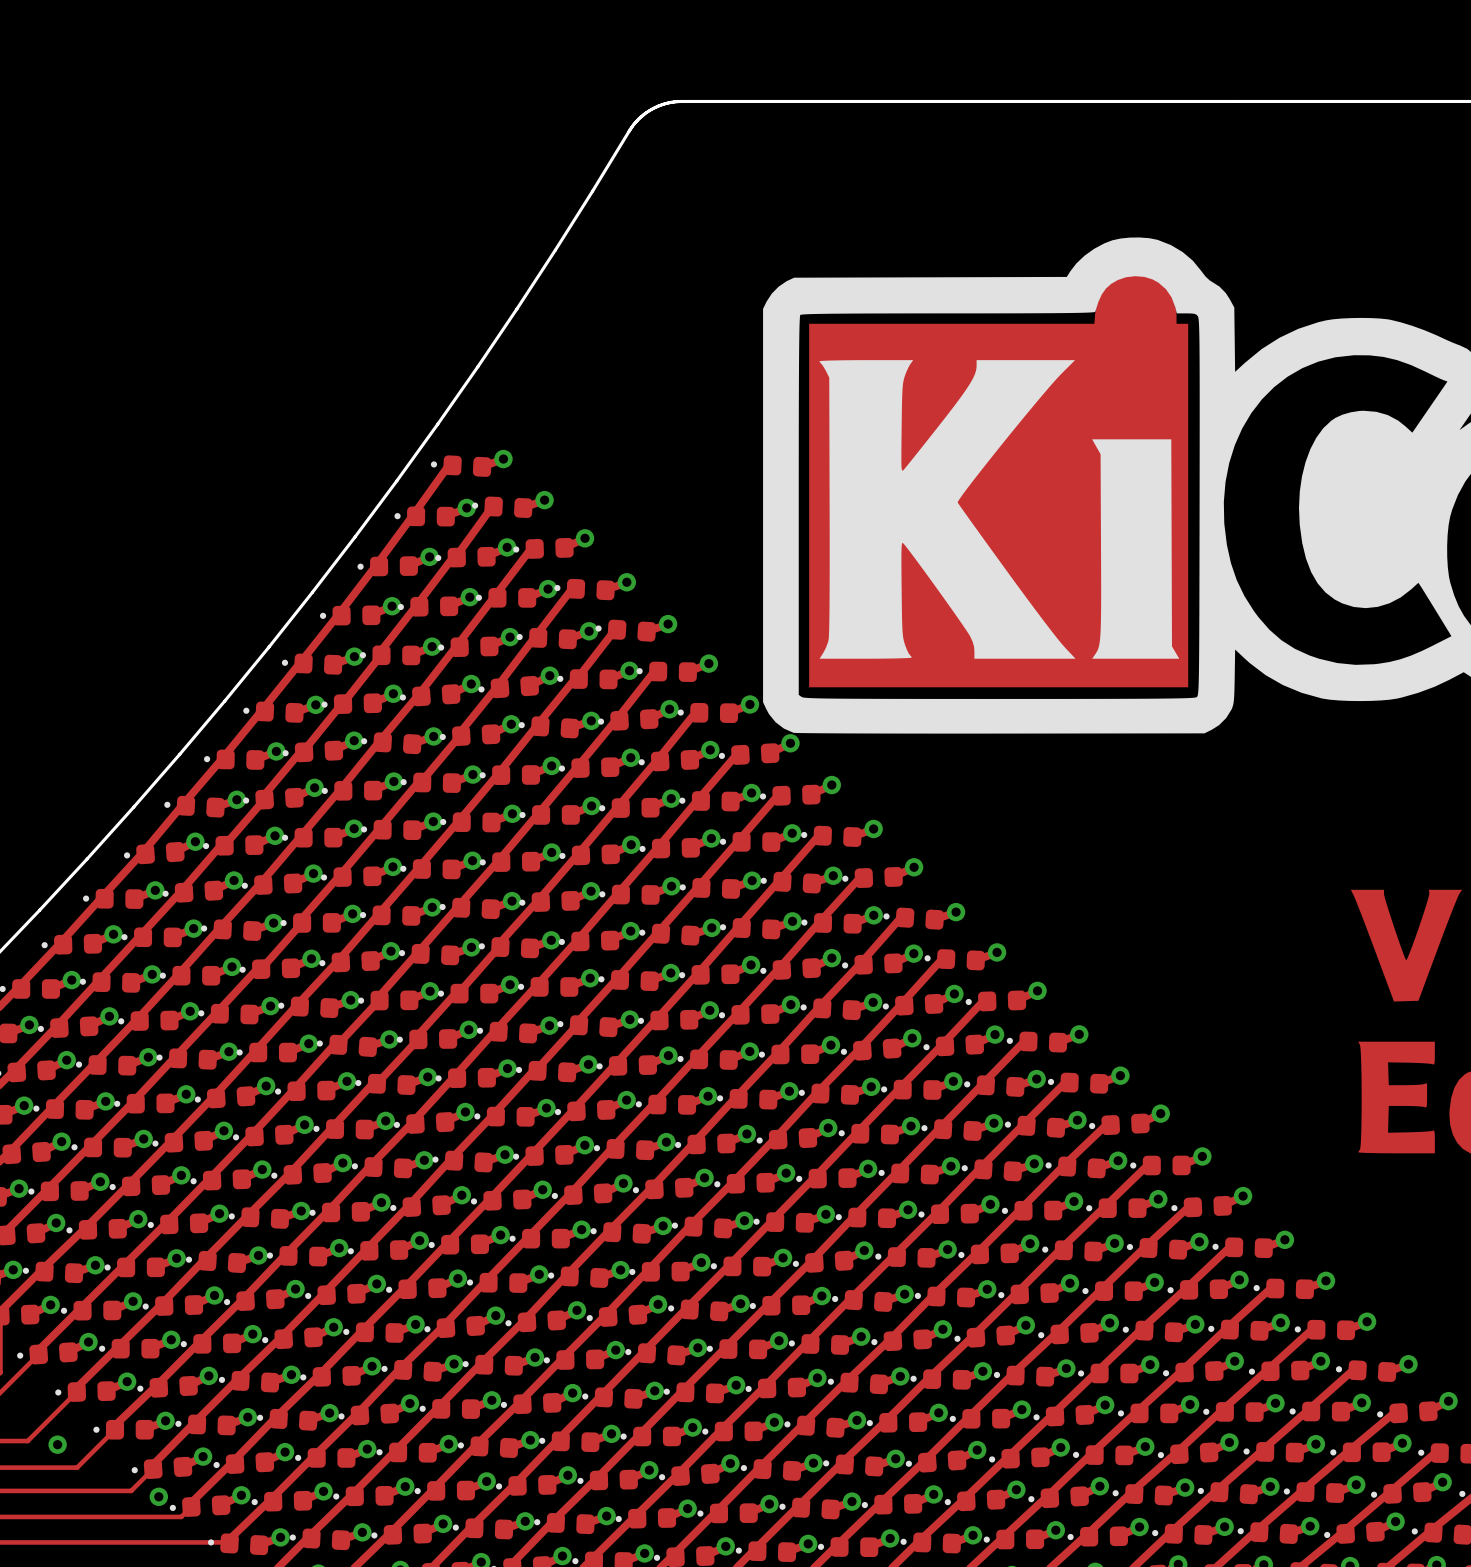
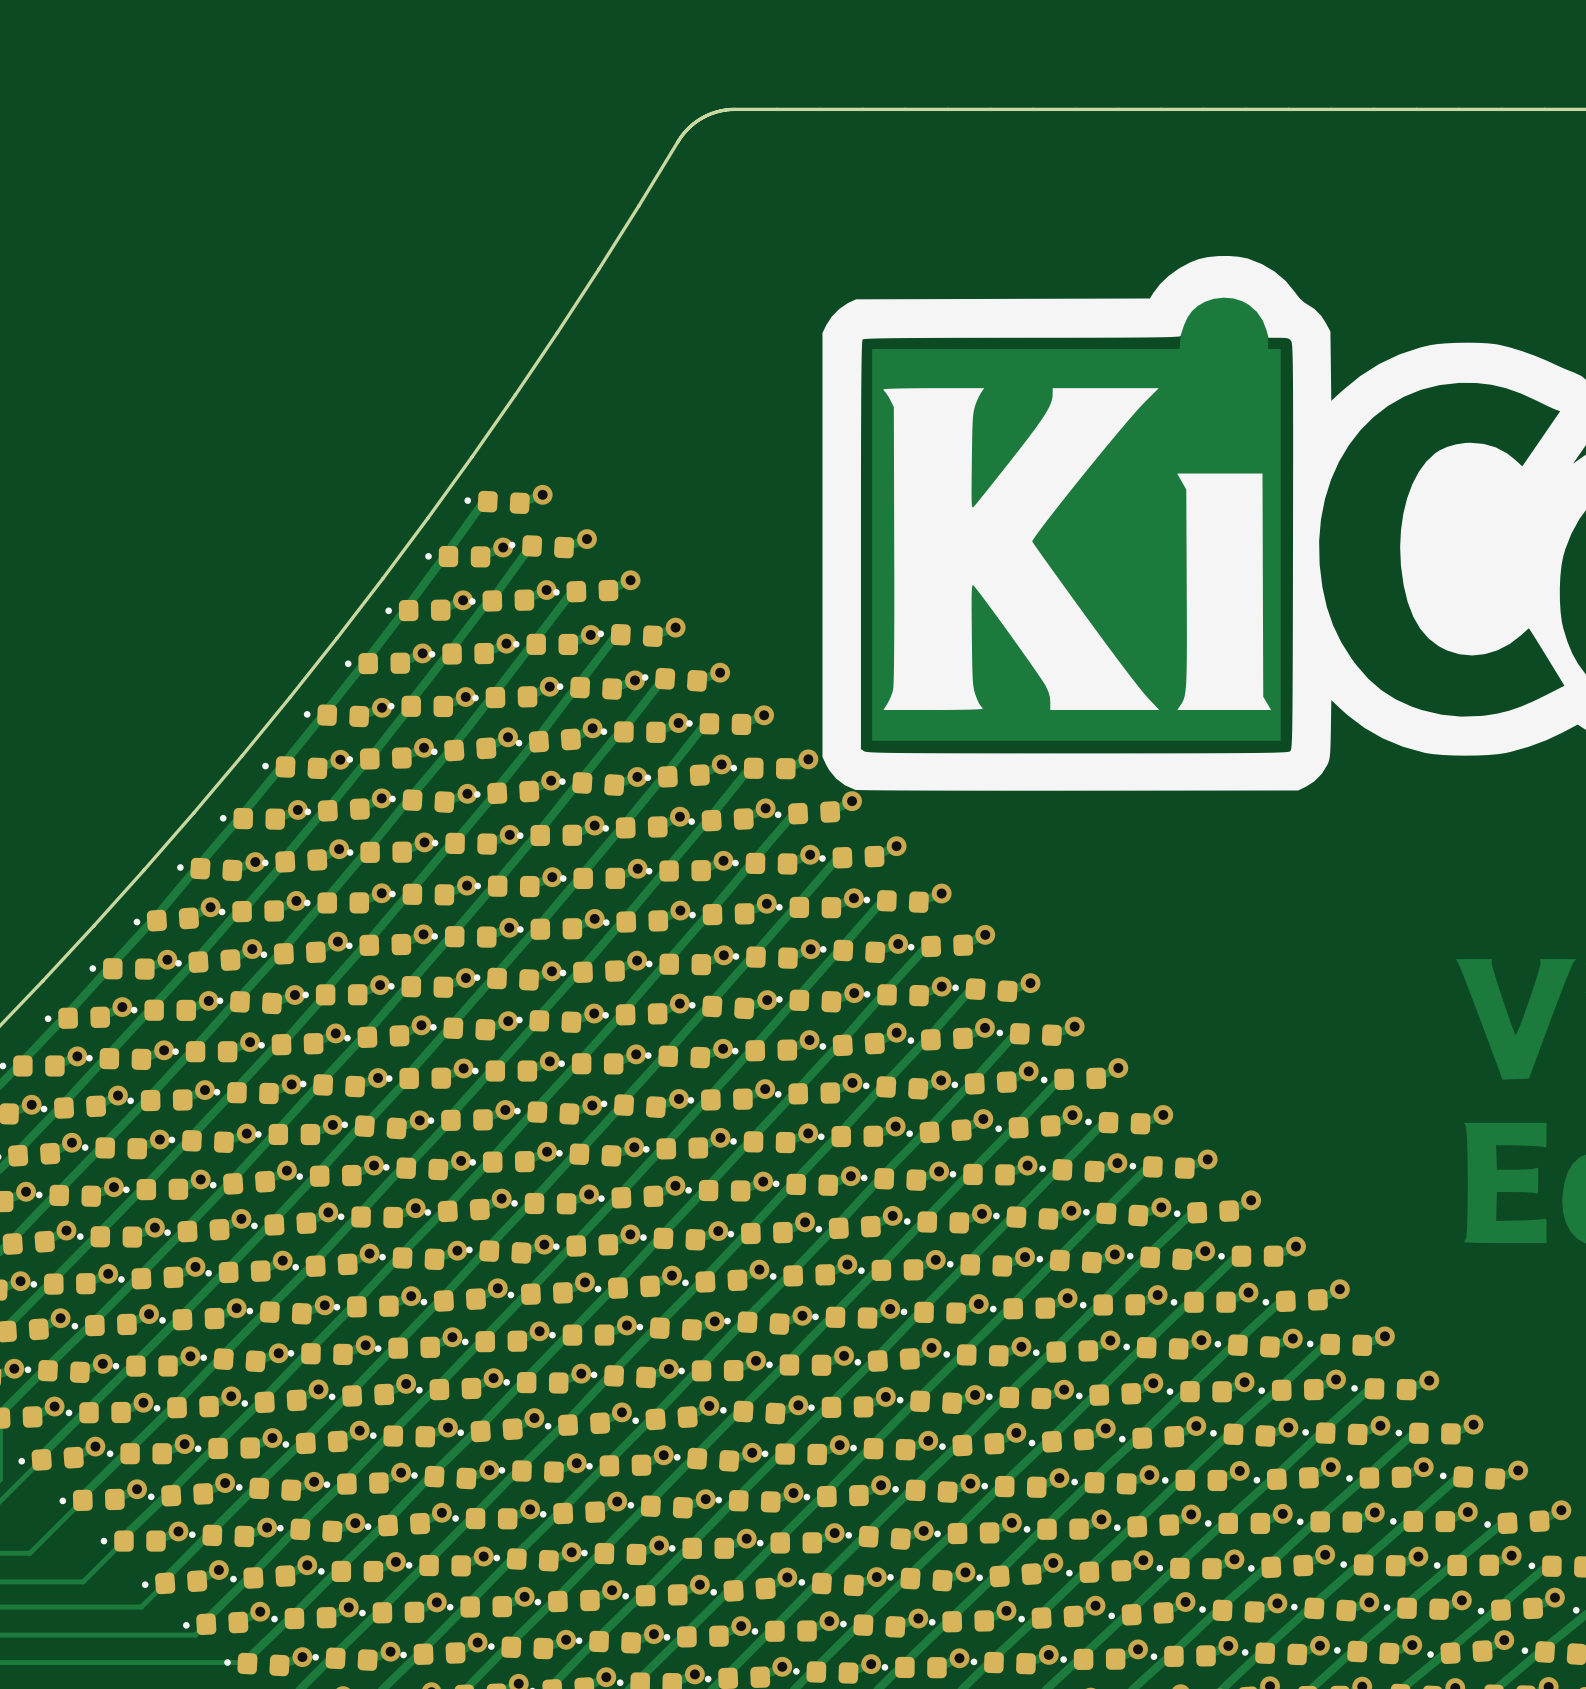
via: (57, 1444) -> none
via: (158, 1496) -> none

